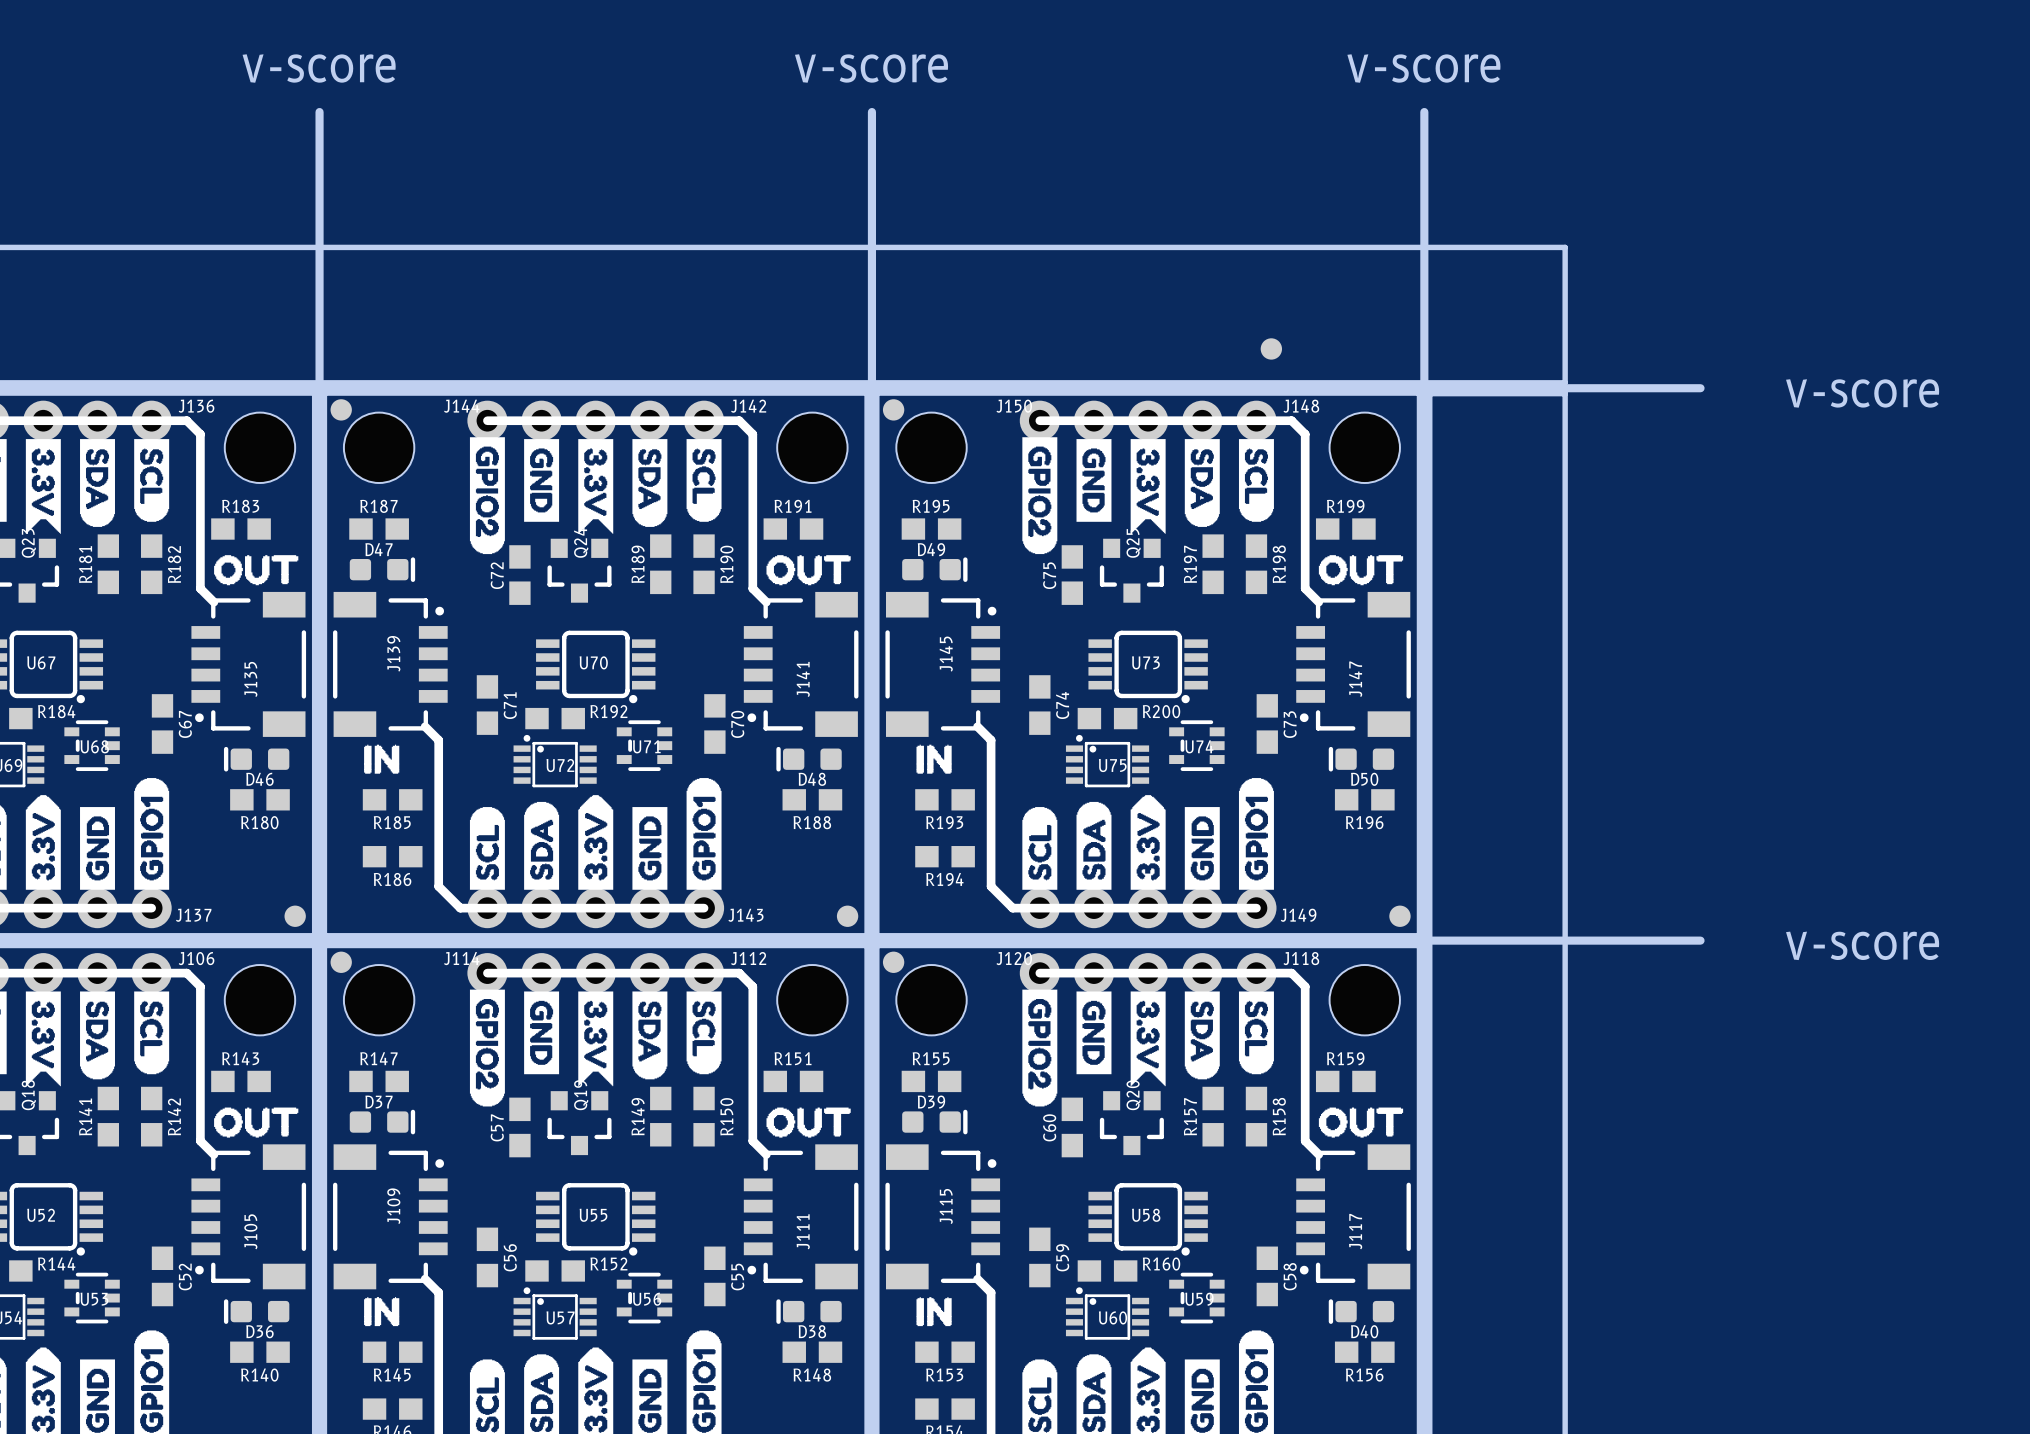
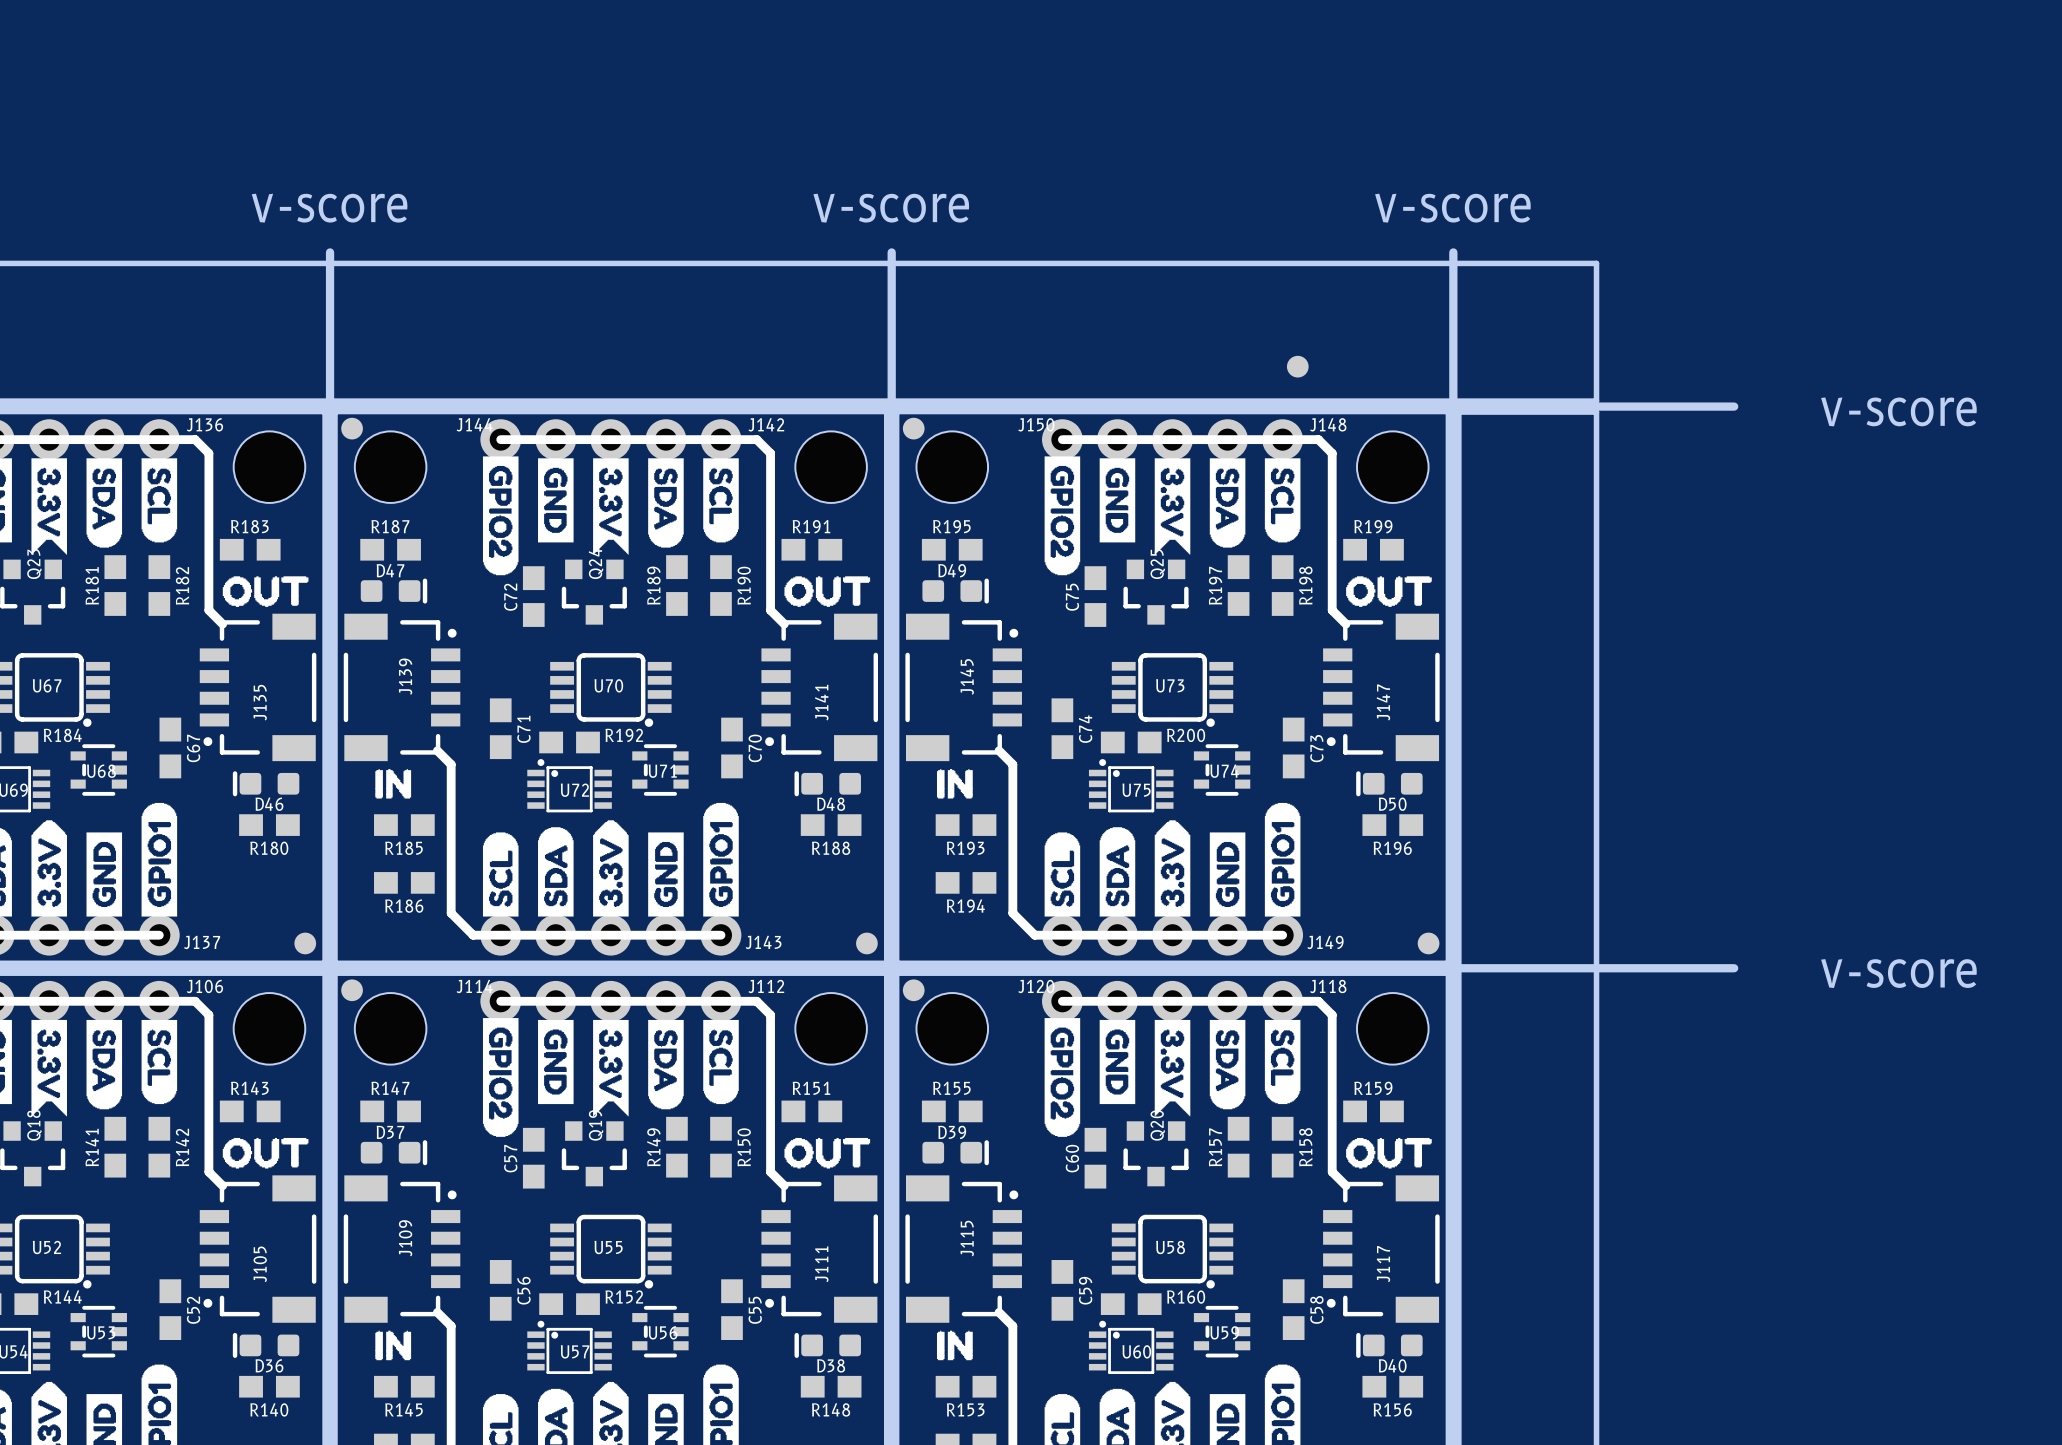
text position: v-score (319, 68) -> v-score (329, 208)
text position: v-score (871, 68) -> v-score (891, 208)
text position: v-score (1423, 68) -> v-score (1452, 208)
board edge: (319, 112) (319, 236) -> none
board edge: (871, 112) (871, 236) -> none
board edge: (1424, 112) (1424, 236) -> none

